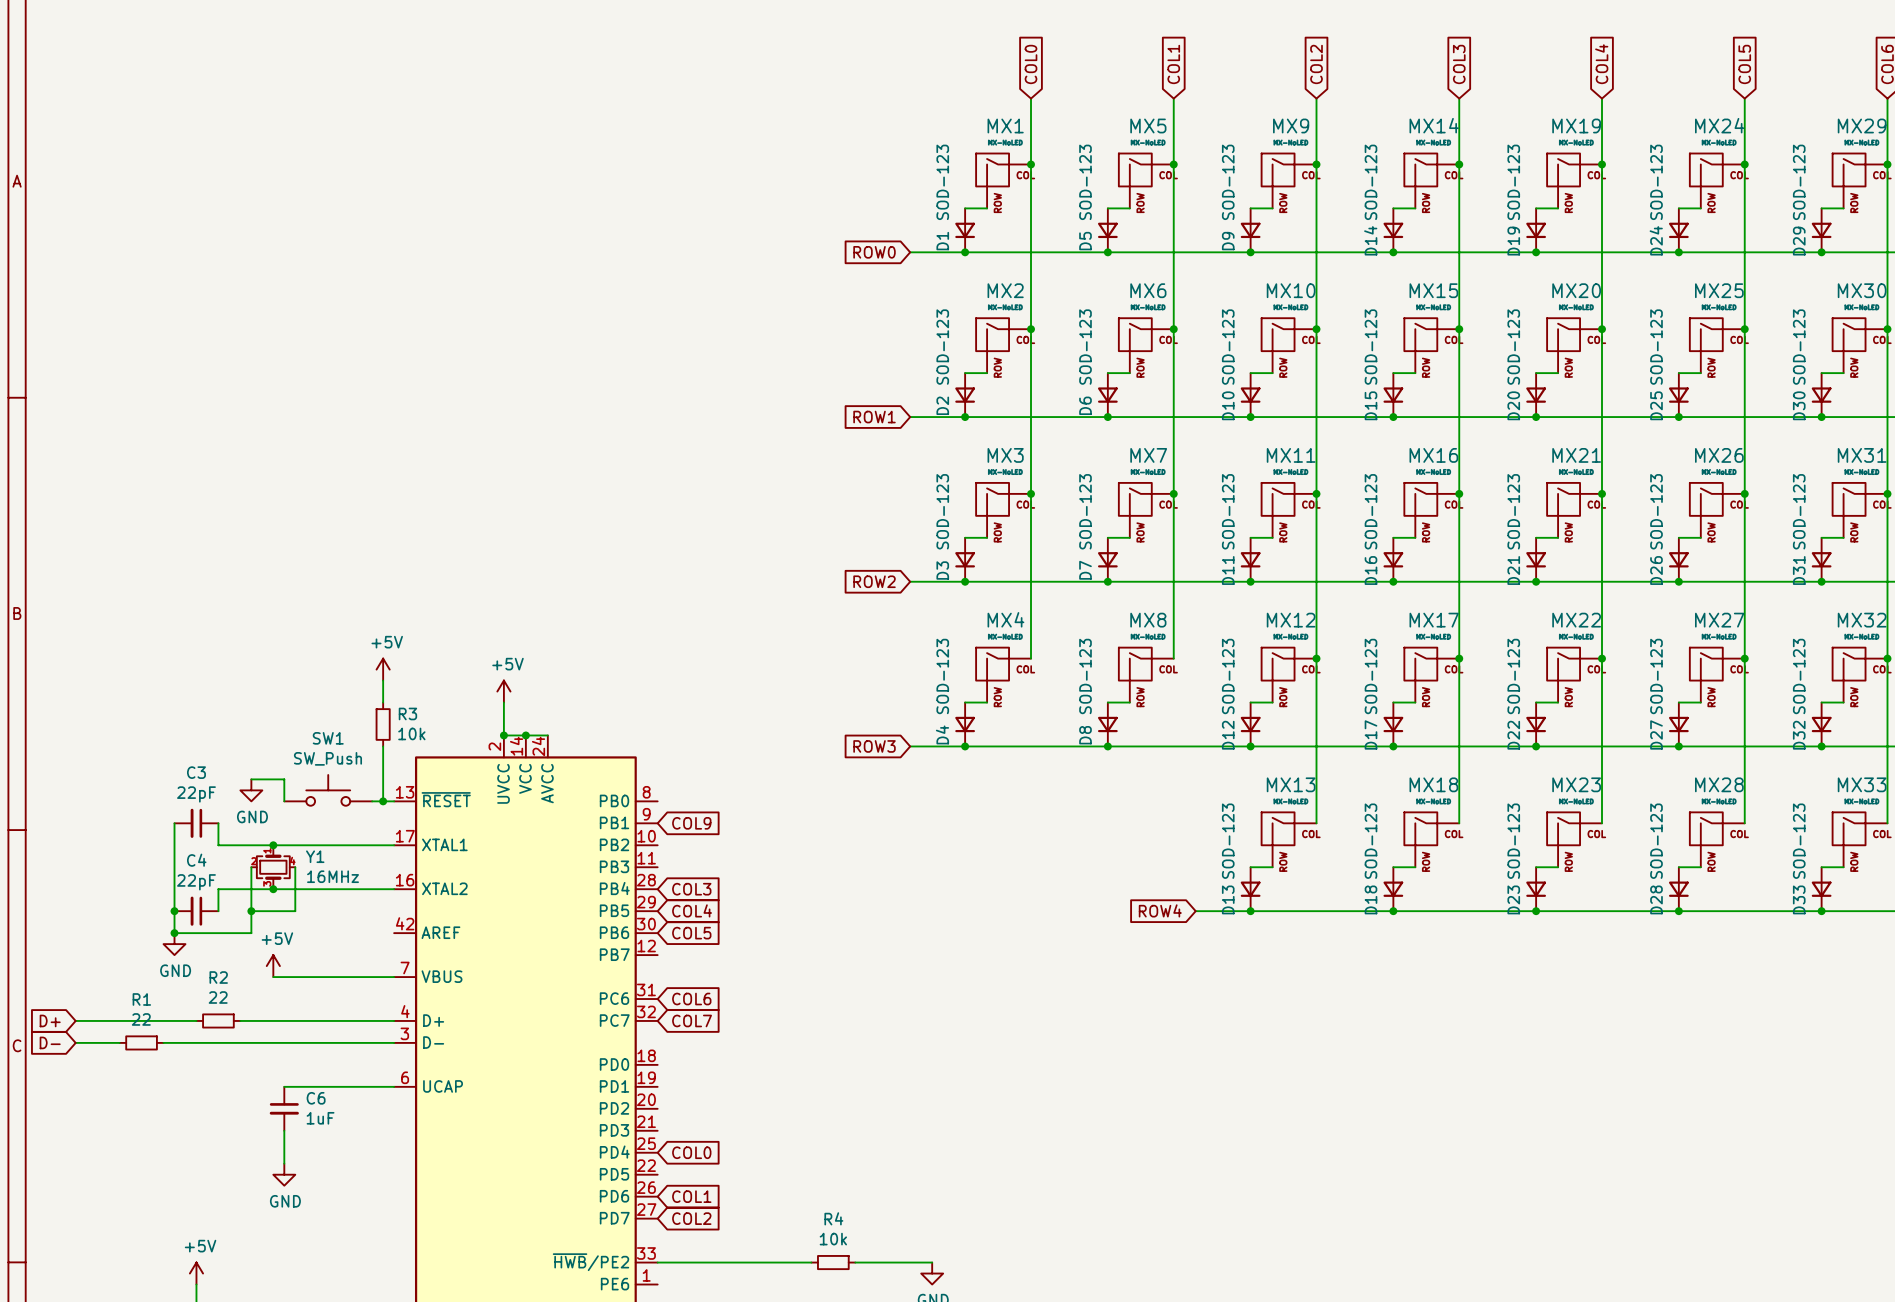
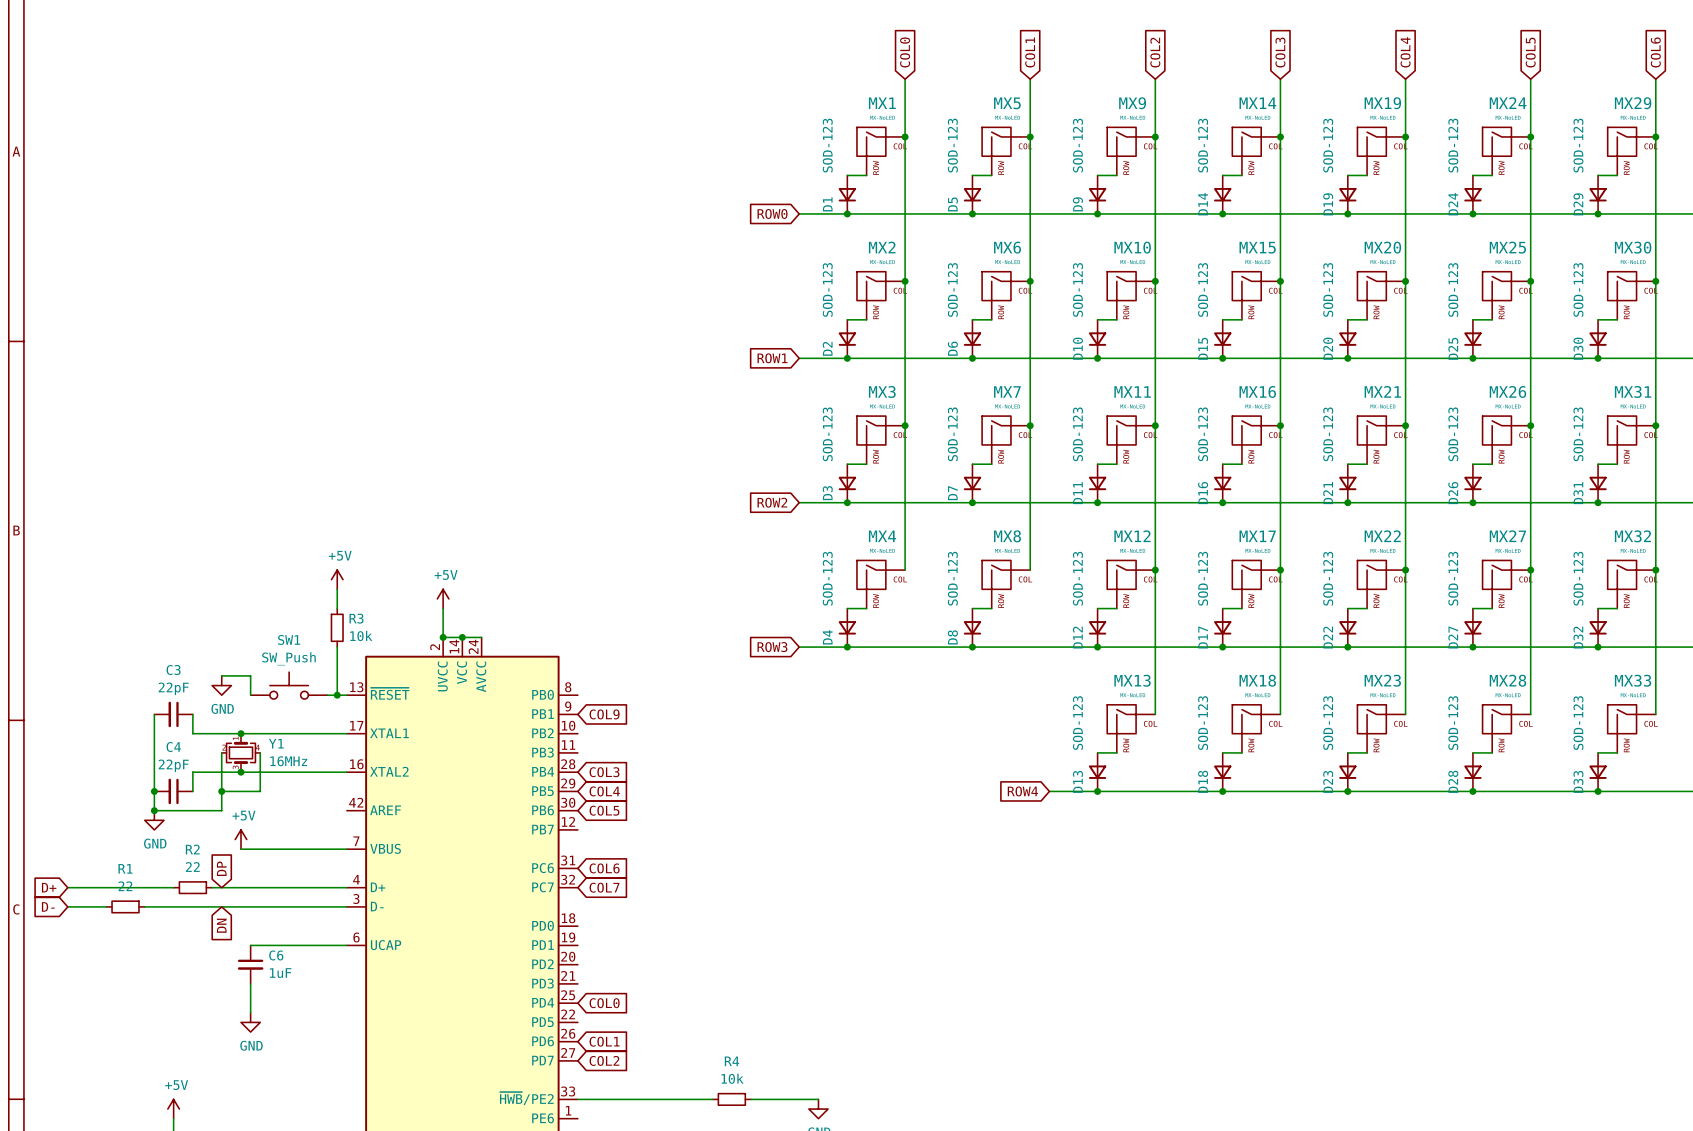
global label: none -> DP (221, 868)
global label: none -> DN (221, 925)

